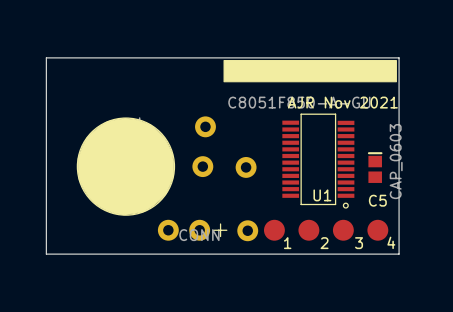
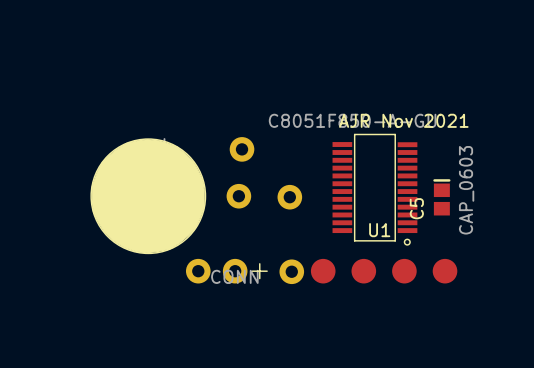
board edge: (46, 57) (399, 57) (399, 254) (46, 254) (46, 57) -> none
drawing: [223, 60, 397, 83] -> none
C5 name rotation: 0° (377, 200) -> 90° counterclockwise (416, 208)
C5 name position: C5 (377, 200) -> C5 (416, 208)
text: 4 (391, 242) -> none
text: 1 (287, 243) -> none
text: 2 (324, 243) -> none
text: 3 (359, 243) -> none

